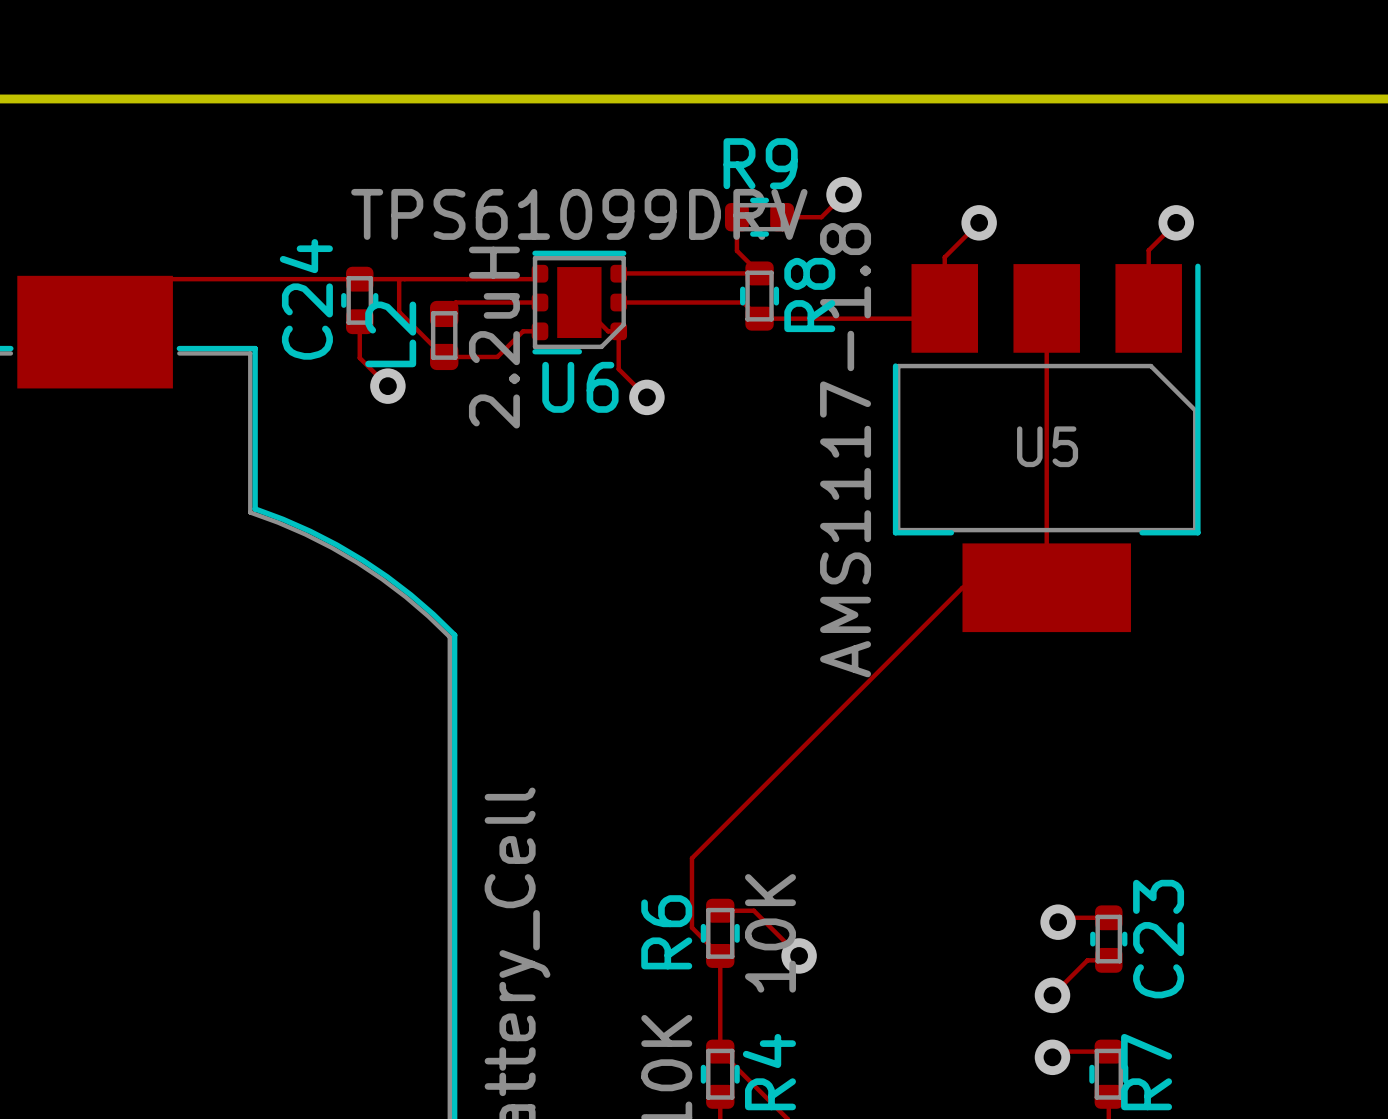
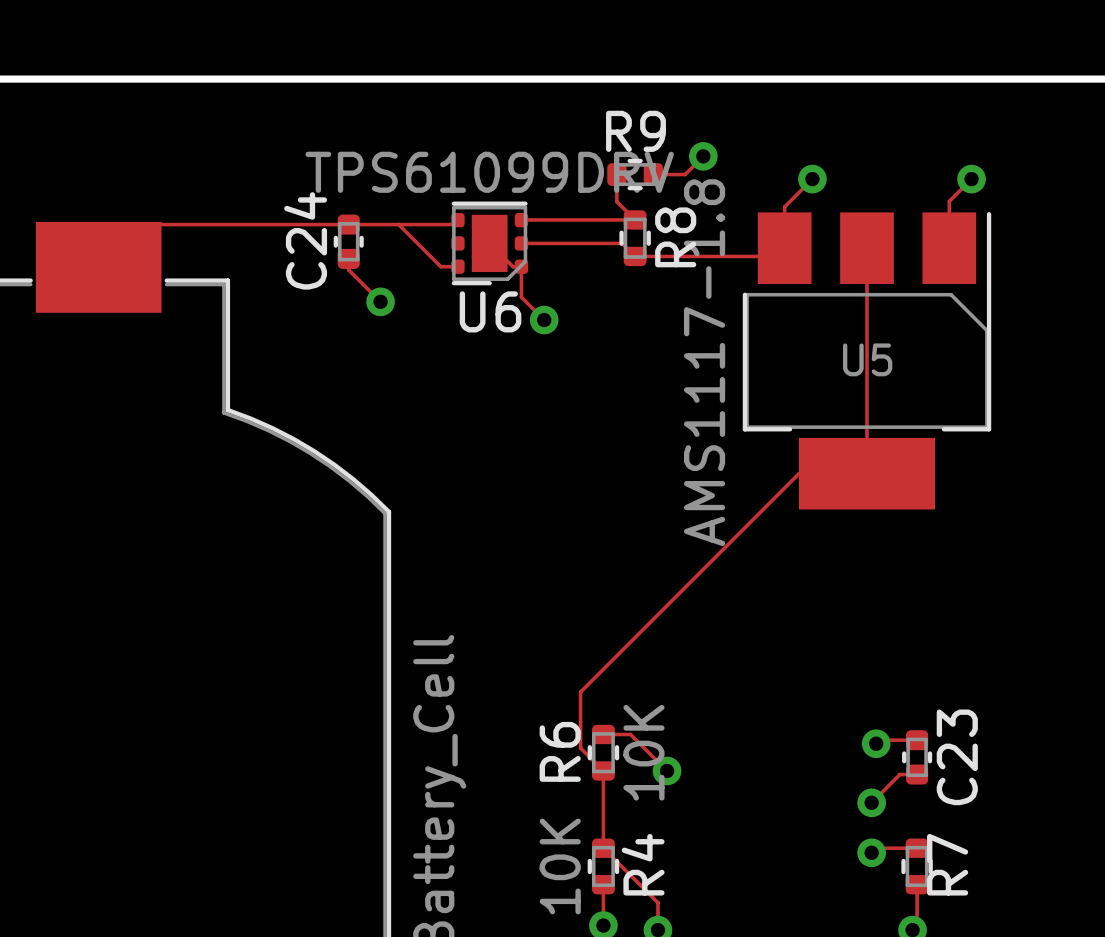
track: (399, 279) (399, 311) (444, 356) (497, 356) (523, 331) -> (398, 224) (440, 266) (444, 266)
C24 position: (359, 300) -> (348, 241)
track: (540, 302) (455, 302) (444, 313) -> none
track: (359, 321) (359, 357) (387, 386) -> none
track: none -> (348, 258) (348, 270) (380, 301)
L2: 2.2uH (444, 335) -> none
via position: (387, 386) -> (380, 301)

